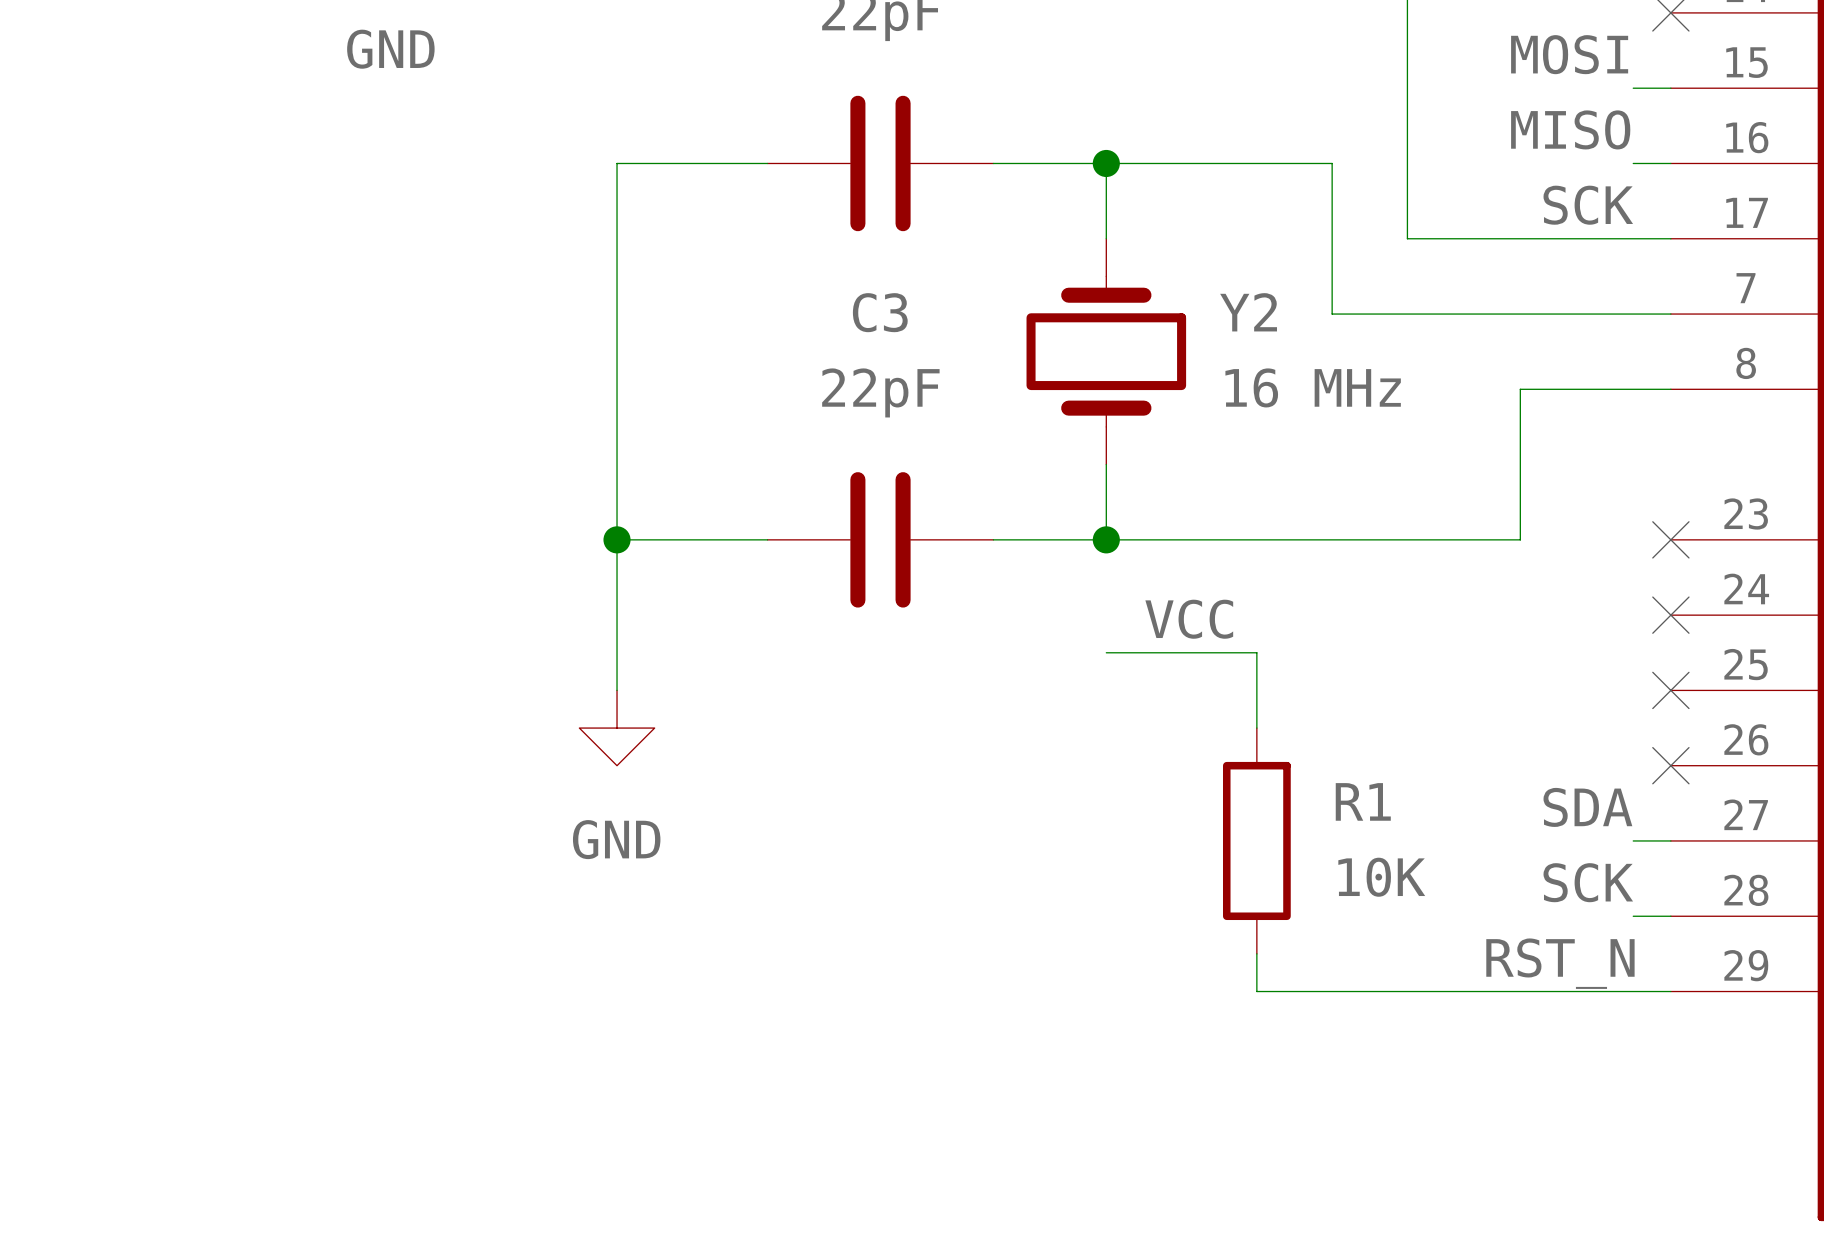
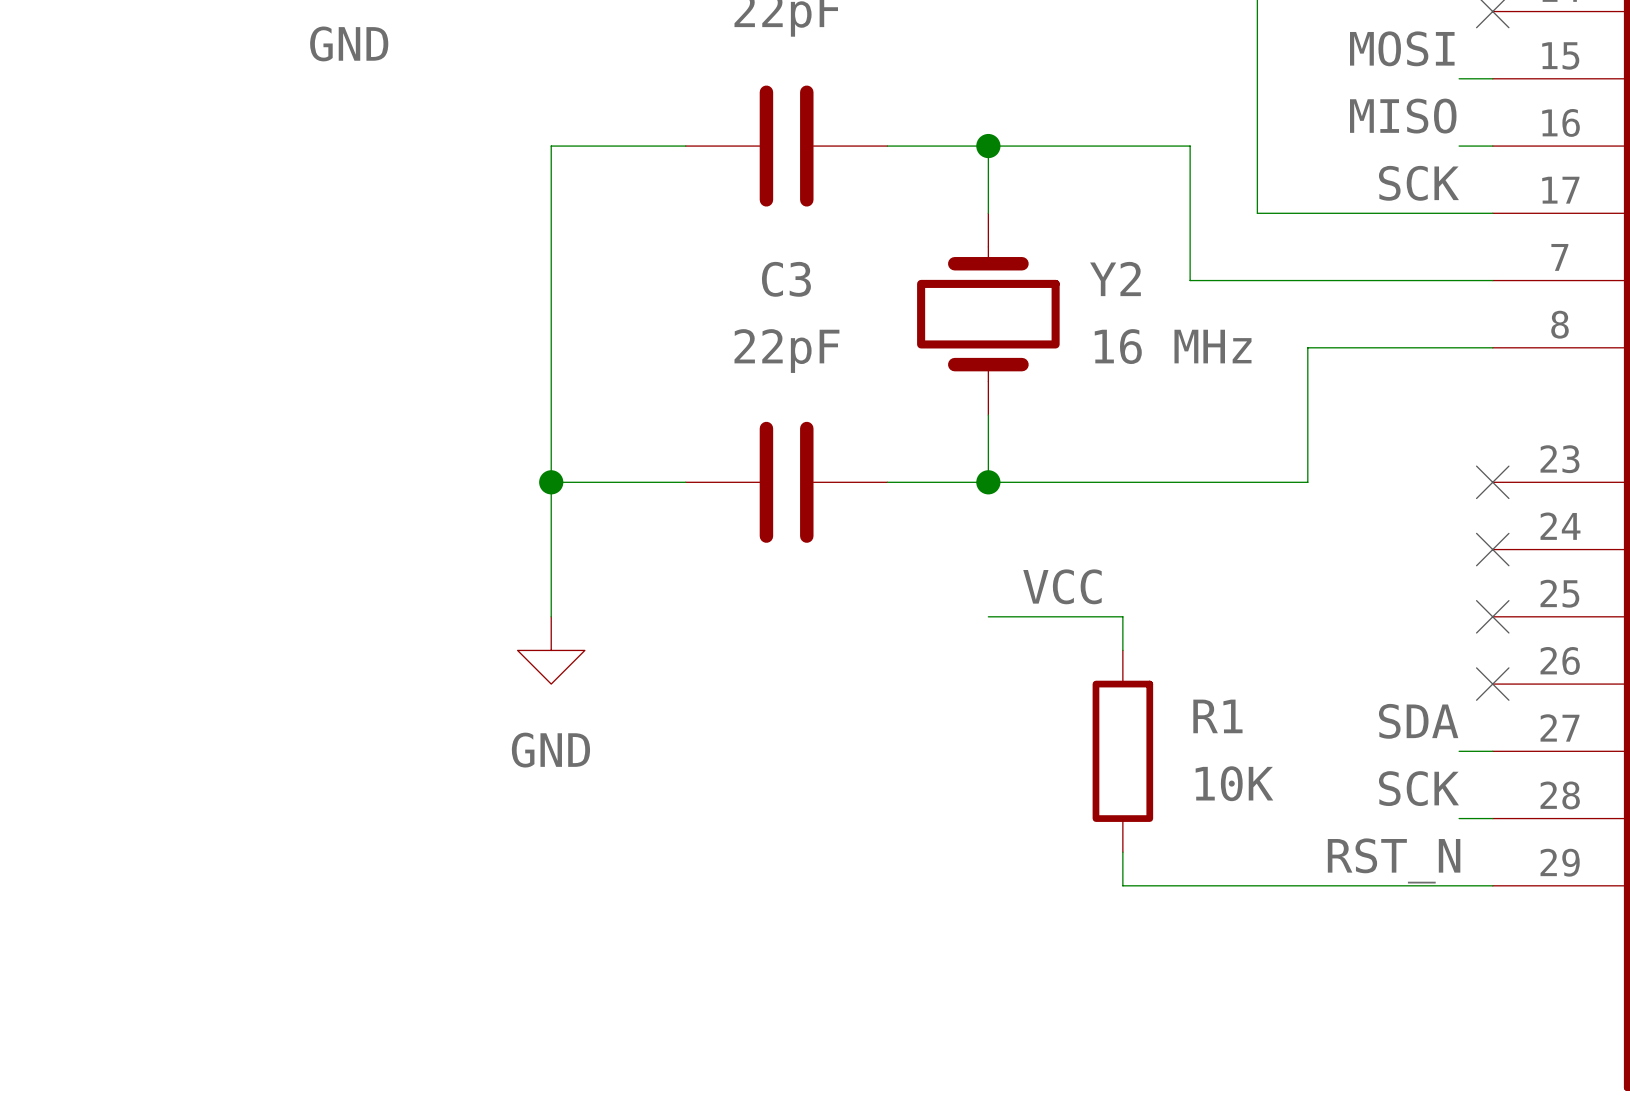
wire: (1520, 389) (1520, 539) (1463, 539) -> (1358, 347) (1307, 347) (1307, 482)
label position: VCC (1189, 619) -> VCC (1062, 586)
wire: (1106, 652) (1256, 652) (1256, 690) -> (988, 616) (1122, 616)

